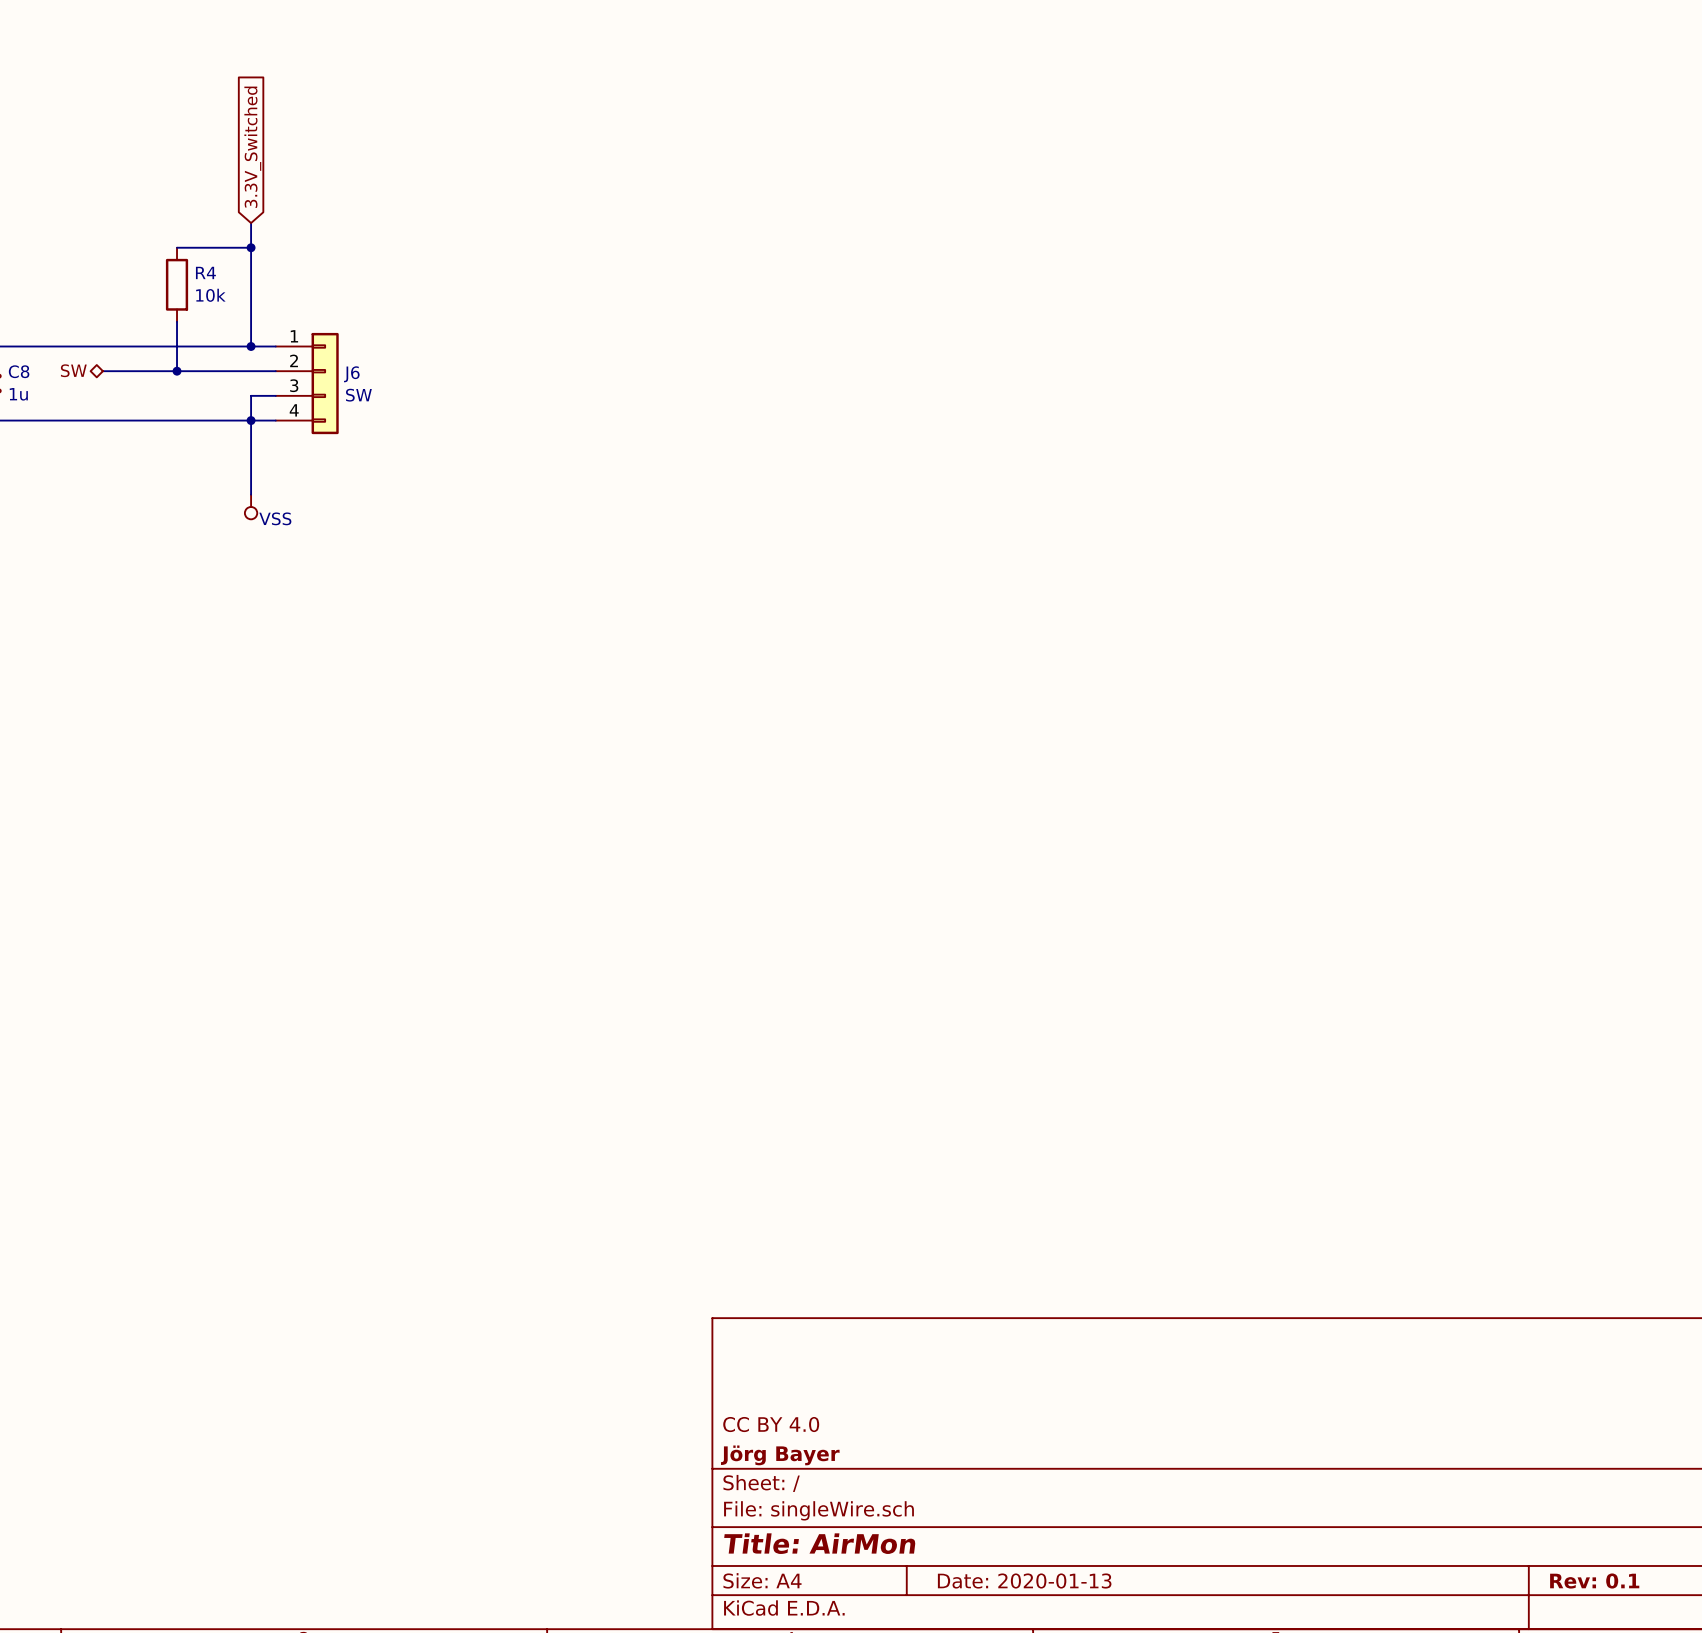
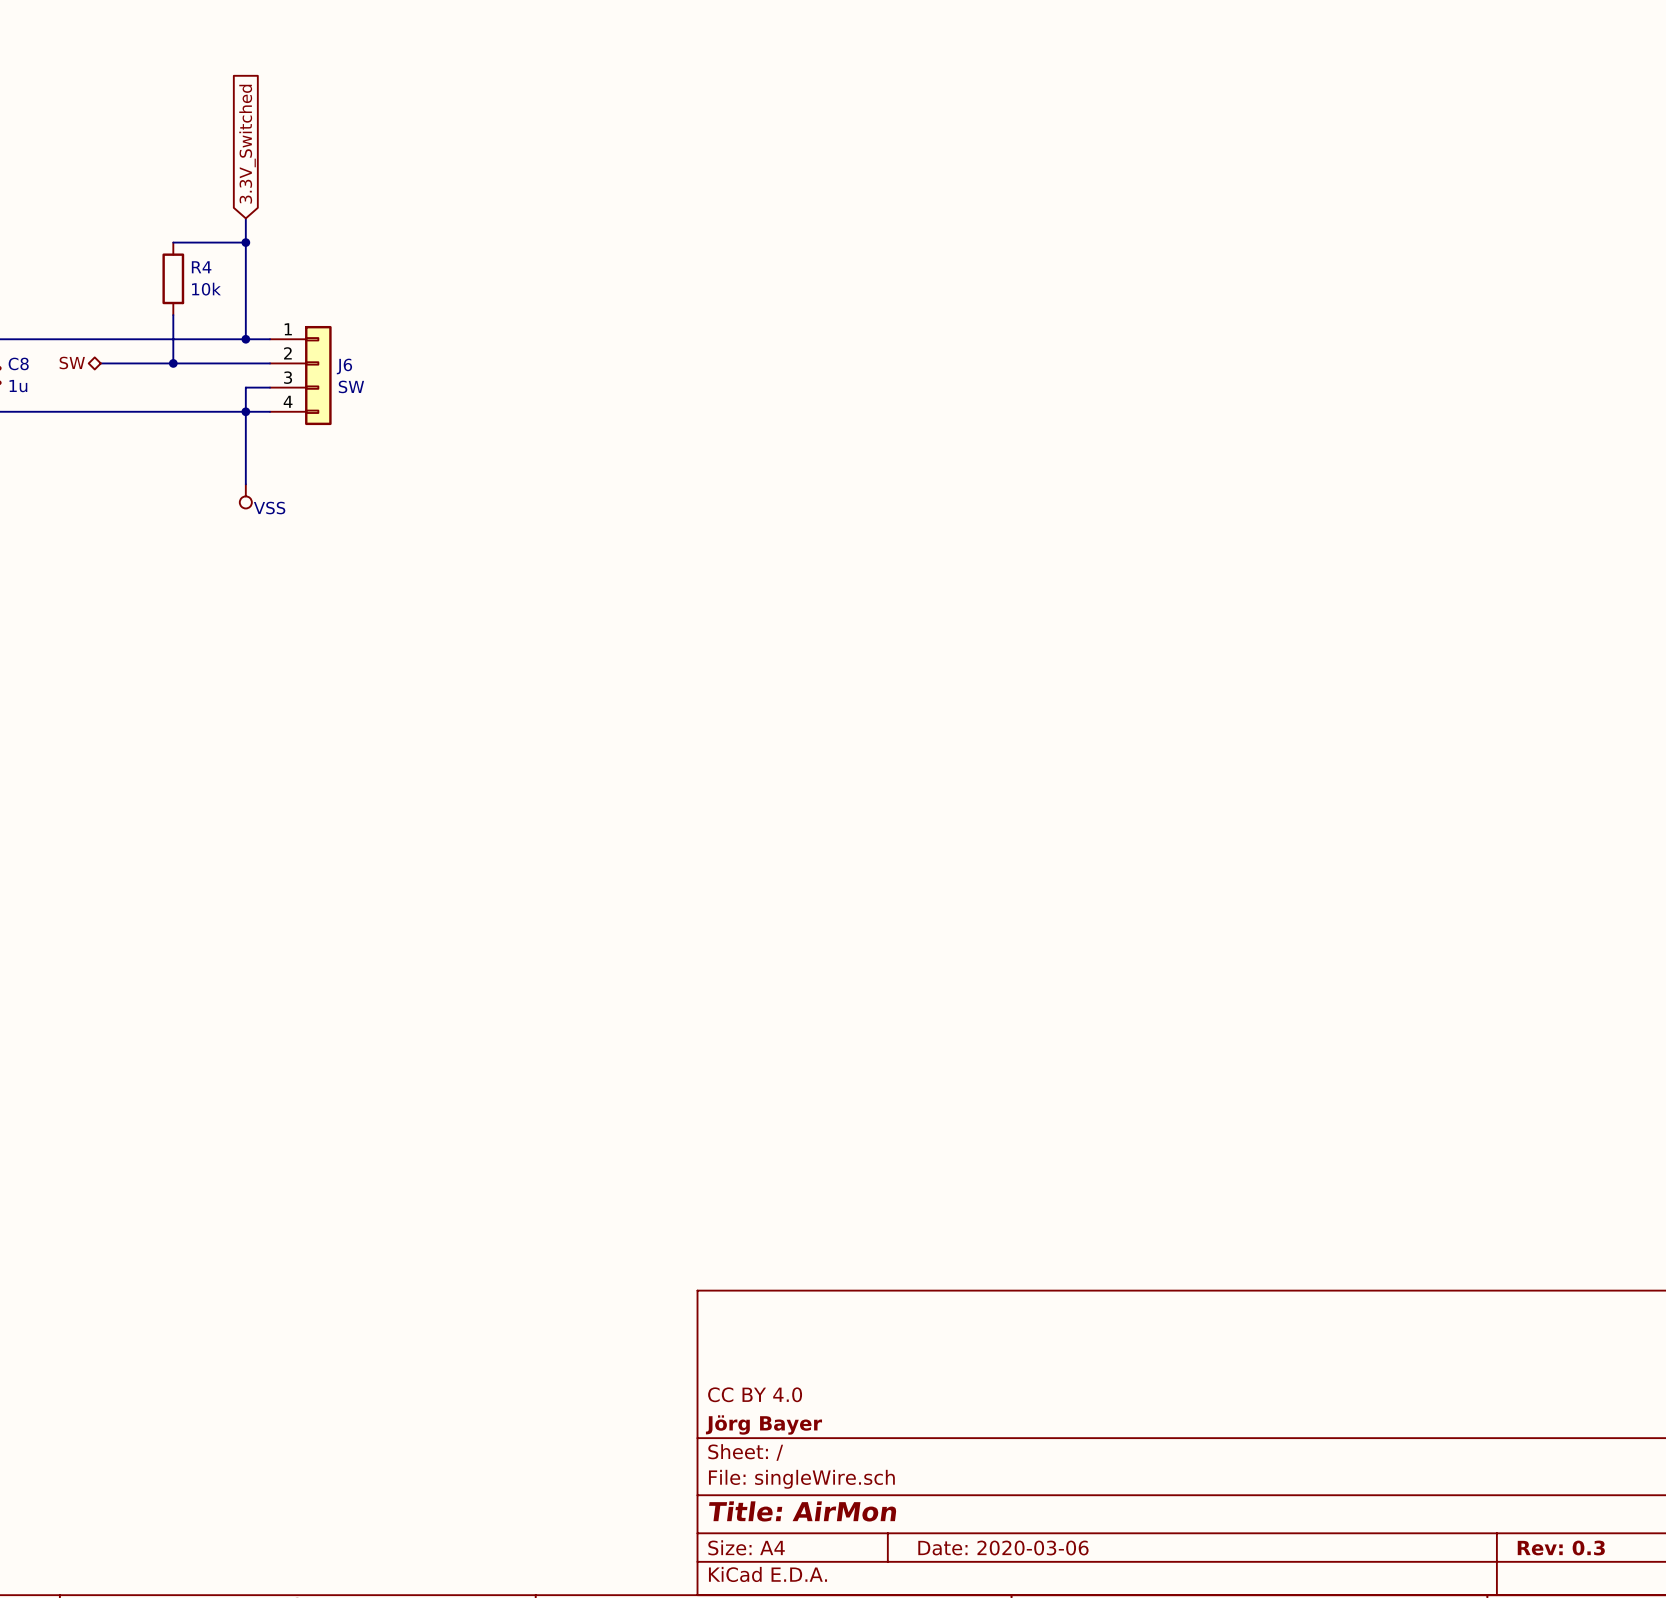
title block: Date: 2020-01-13 (1024, 1581) -> Date: 2020-03-06 (1003, 1548)
title block: Rev: 0.1 (1594, 1581) -> Rev: 0.3 (1561, 1548)

